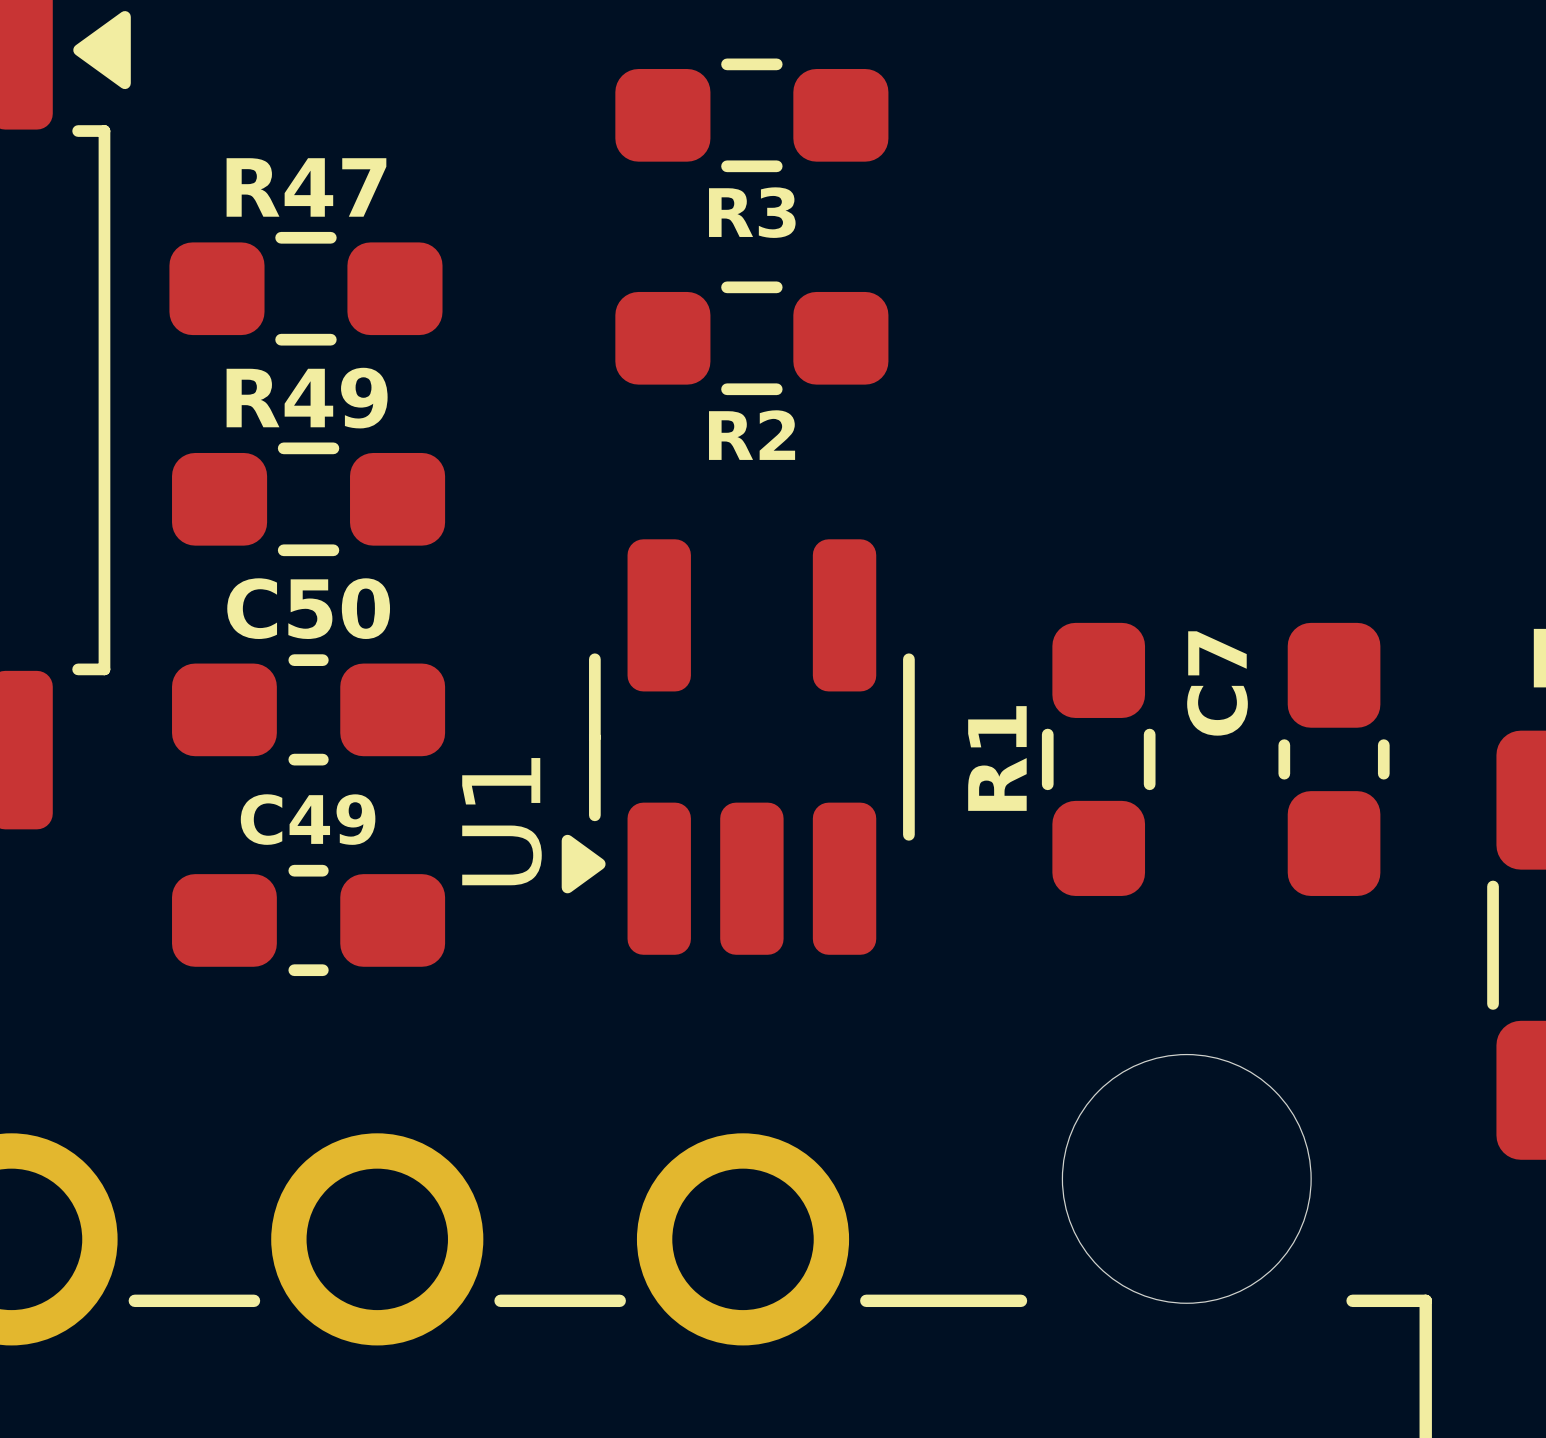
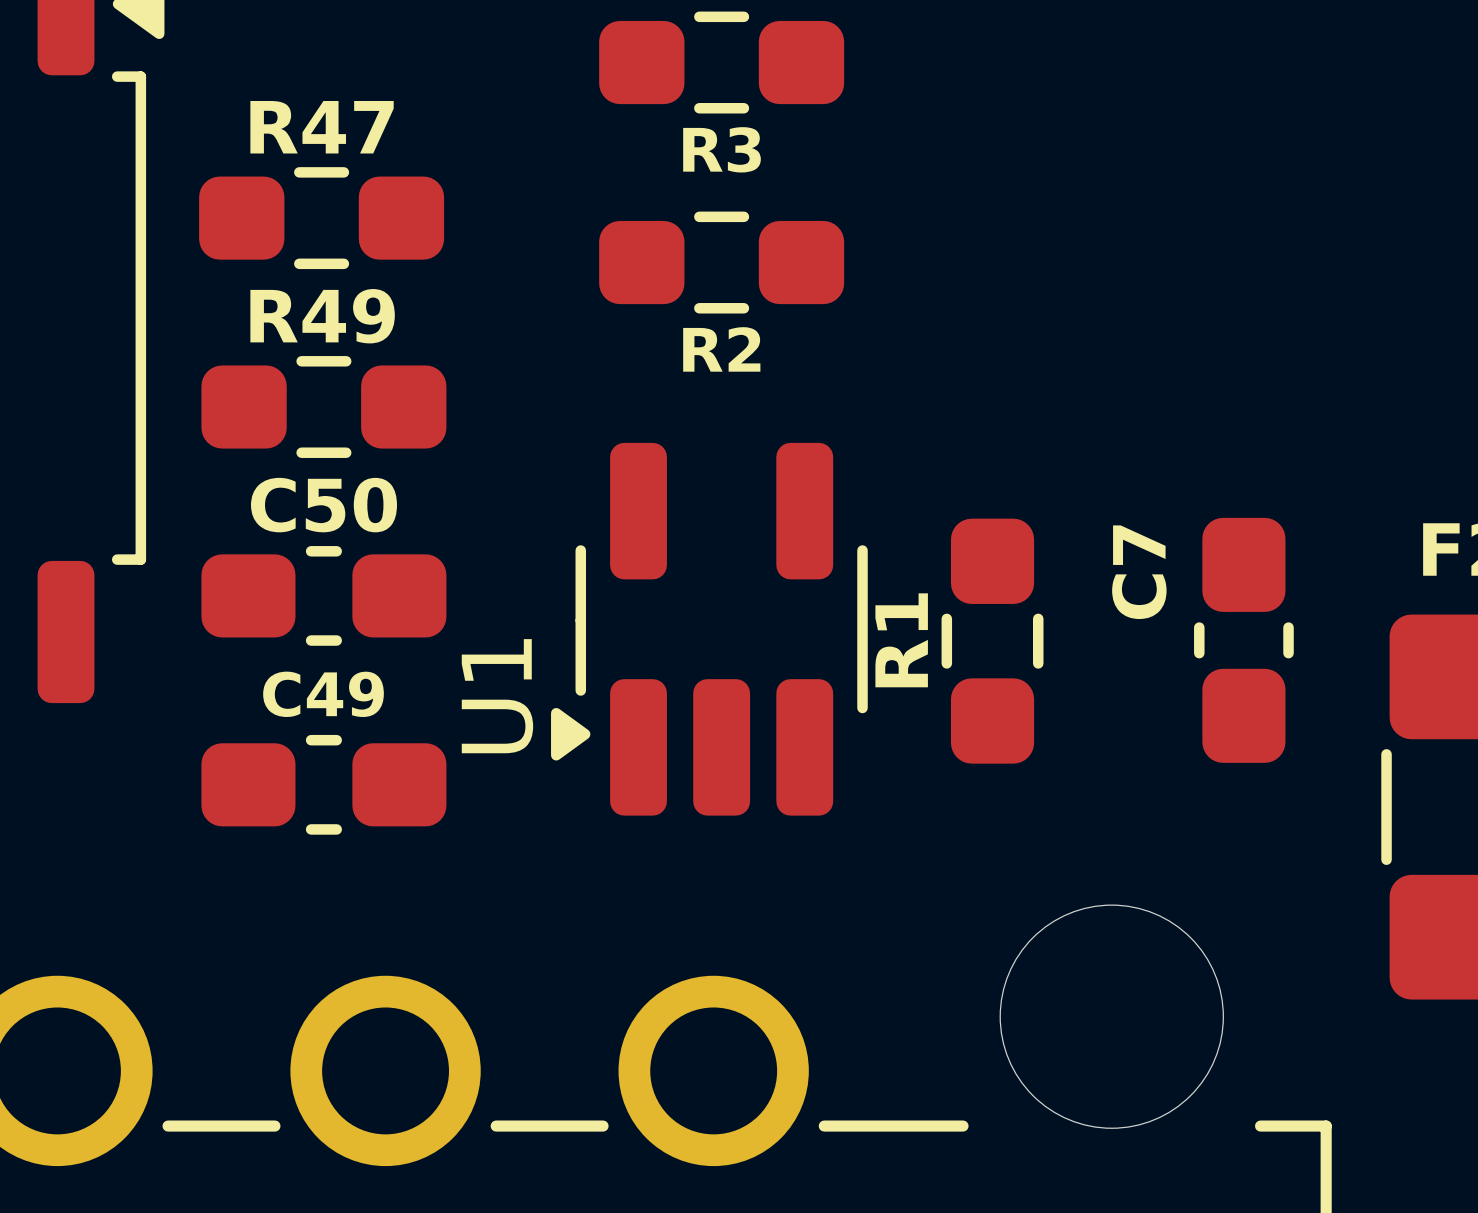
R1 position: (1098, 759) -> (992, 641)

